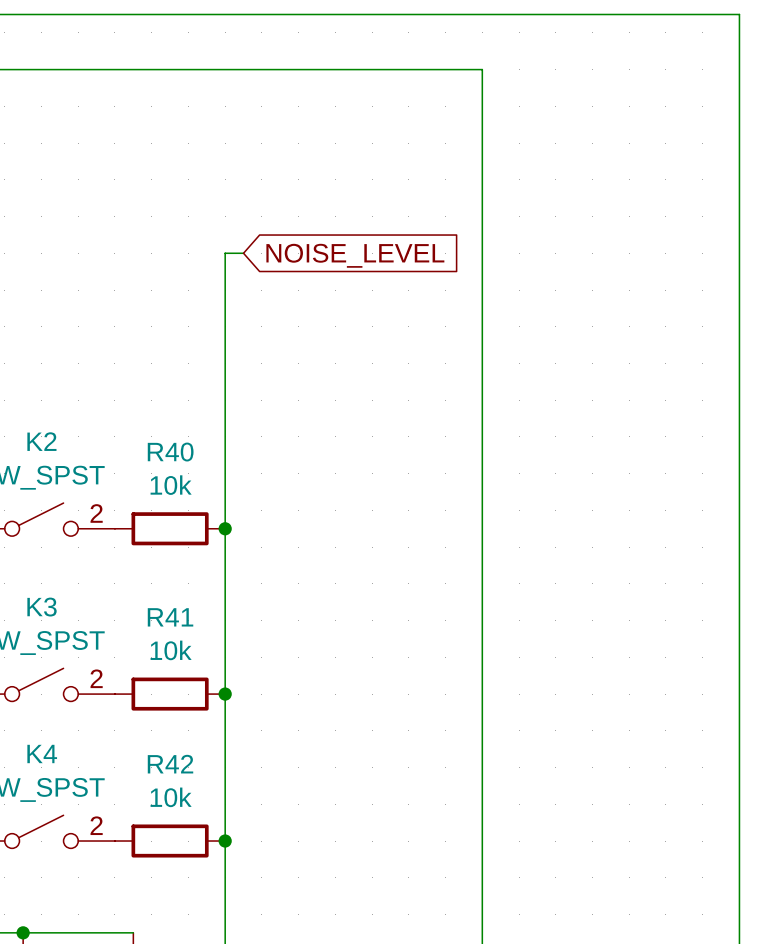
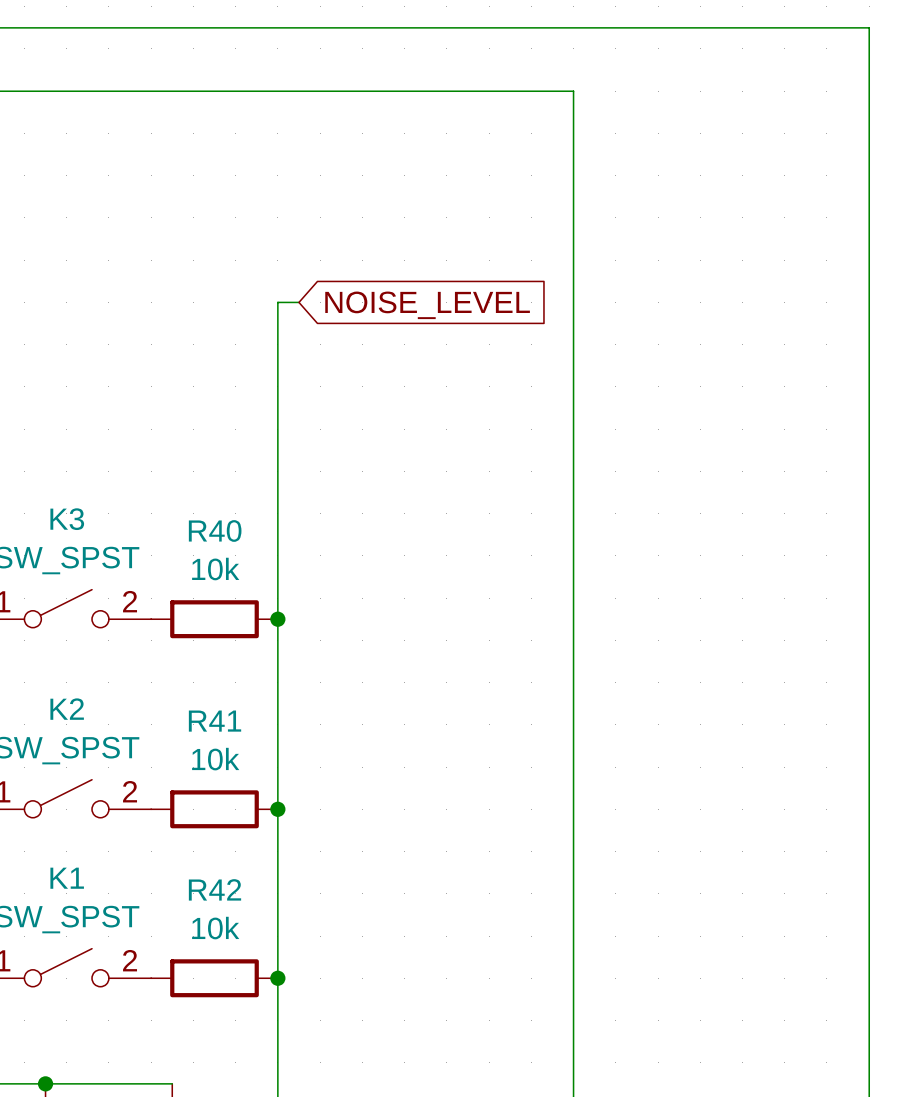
K2 name: K2 (41, 441) -> K3 (67, 519)
K3 name: K3 (42, 607) -> K2 (67, 709)
K4 name: K4 (42, 754) -> K1 (67, 878)

